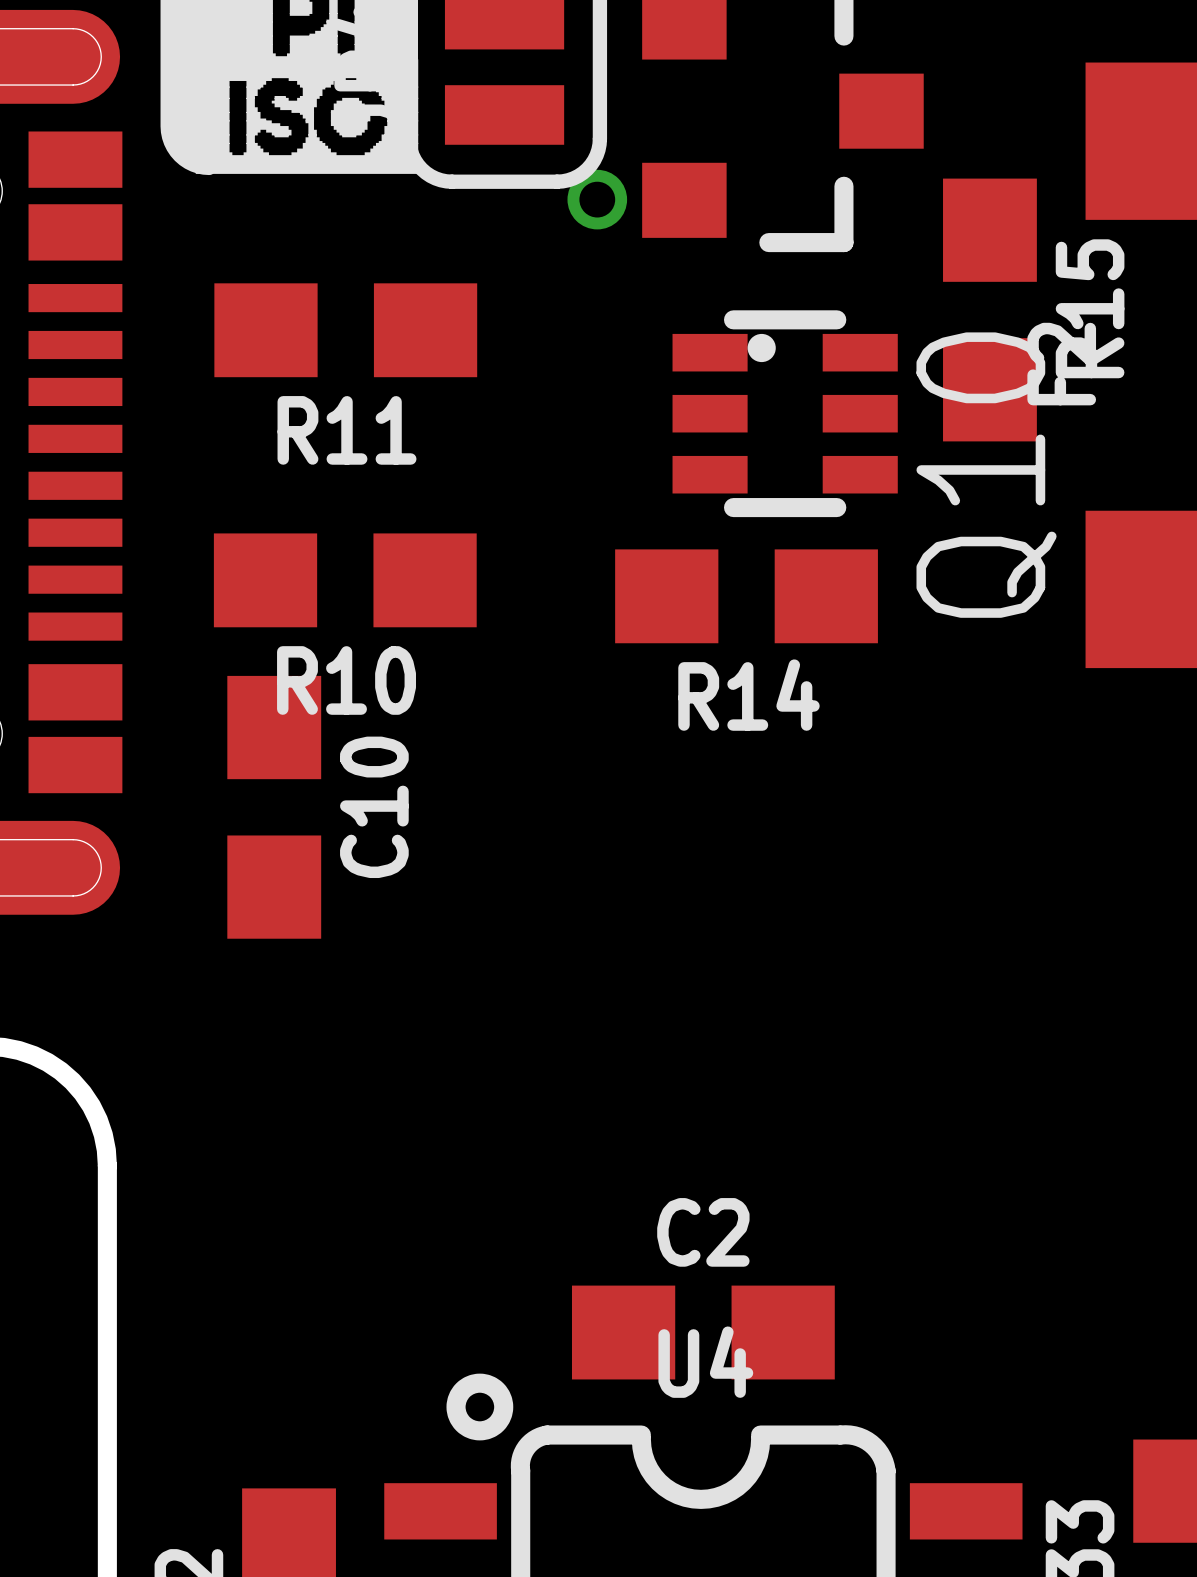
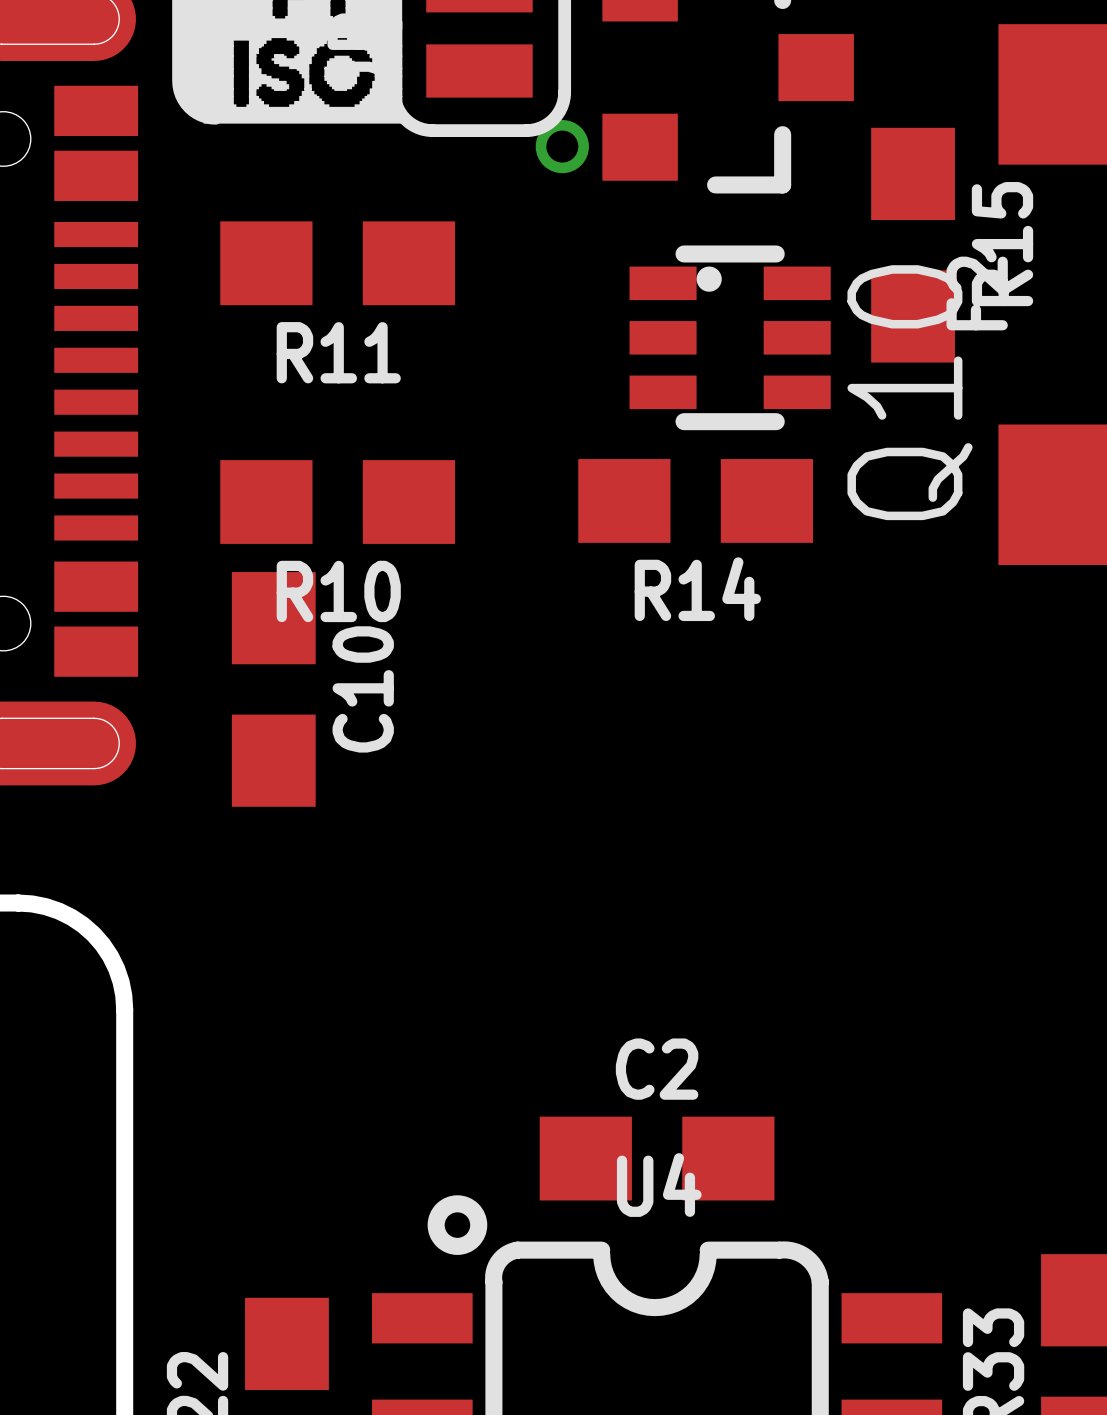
R10 position: (345, 580) -> (337, 502)

